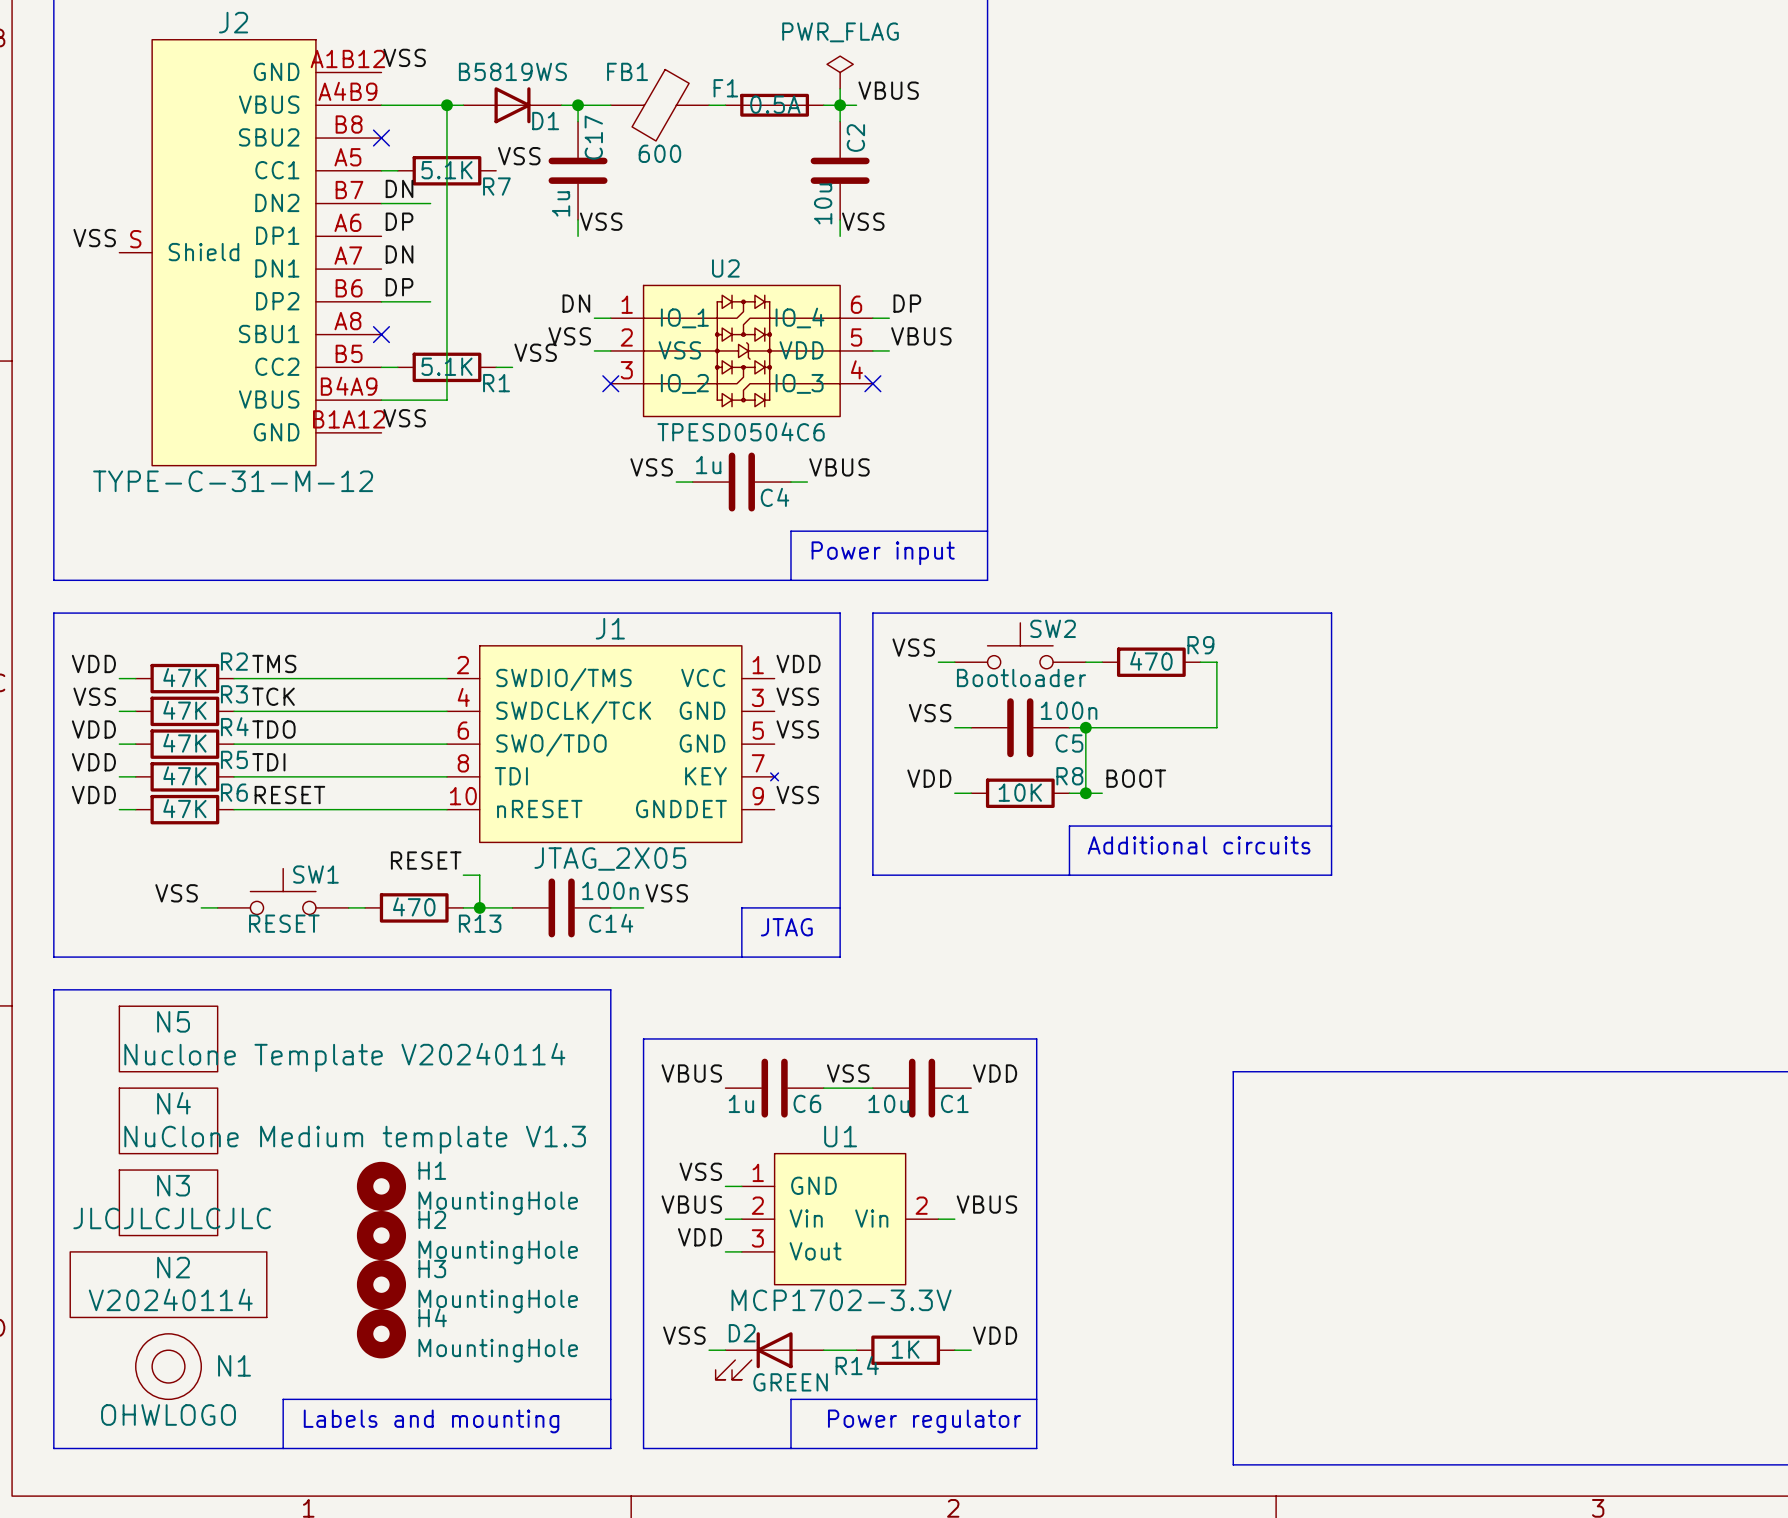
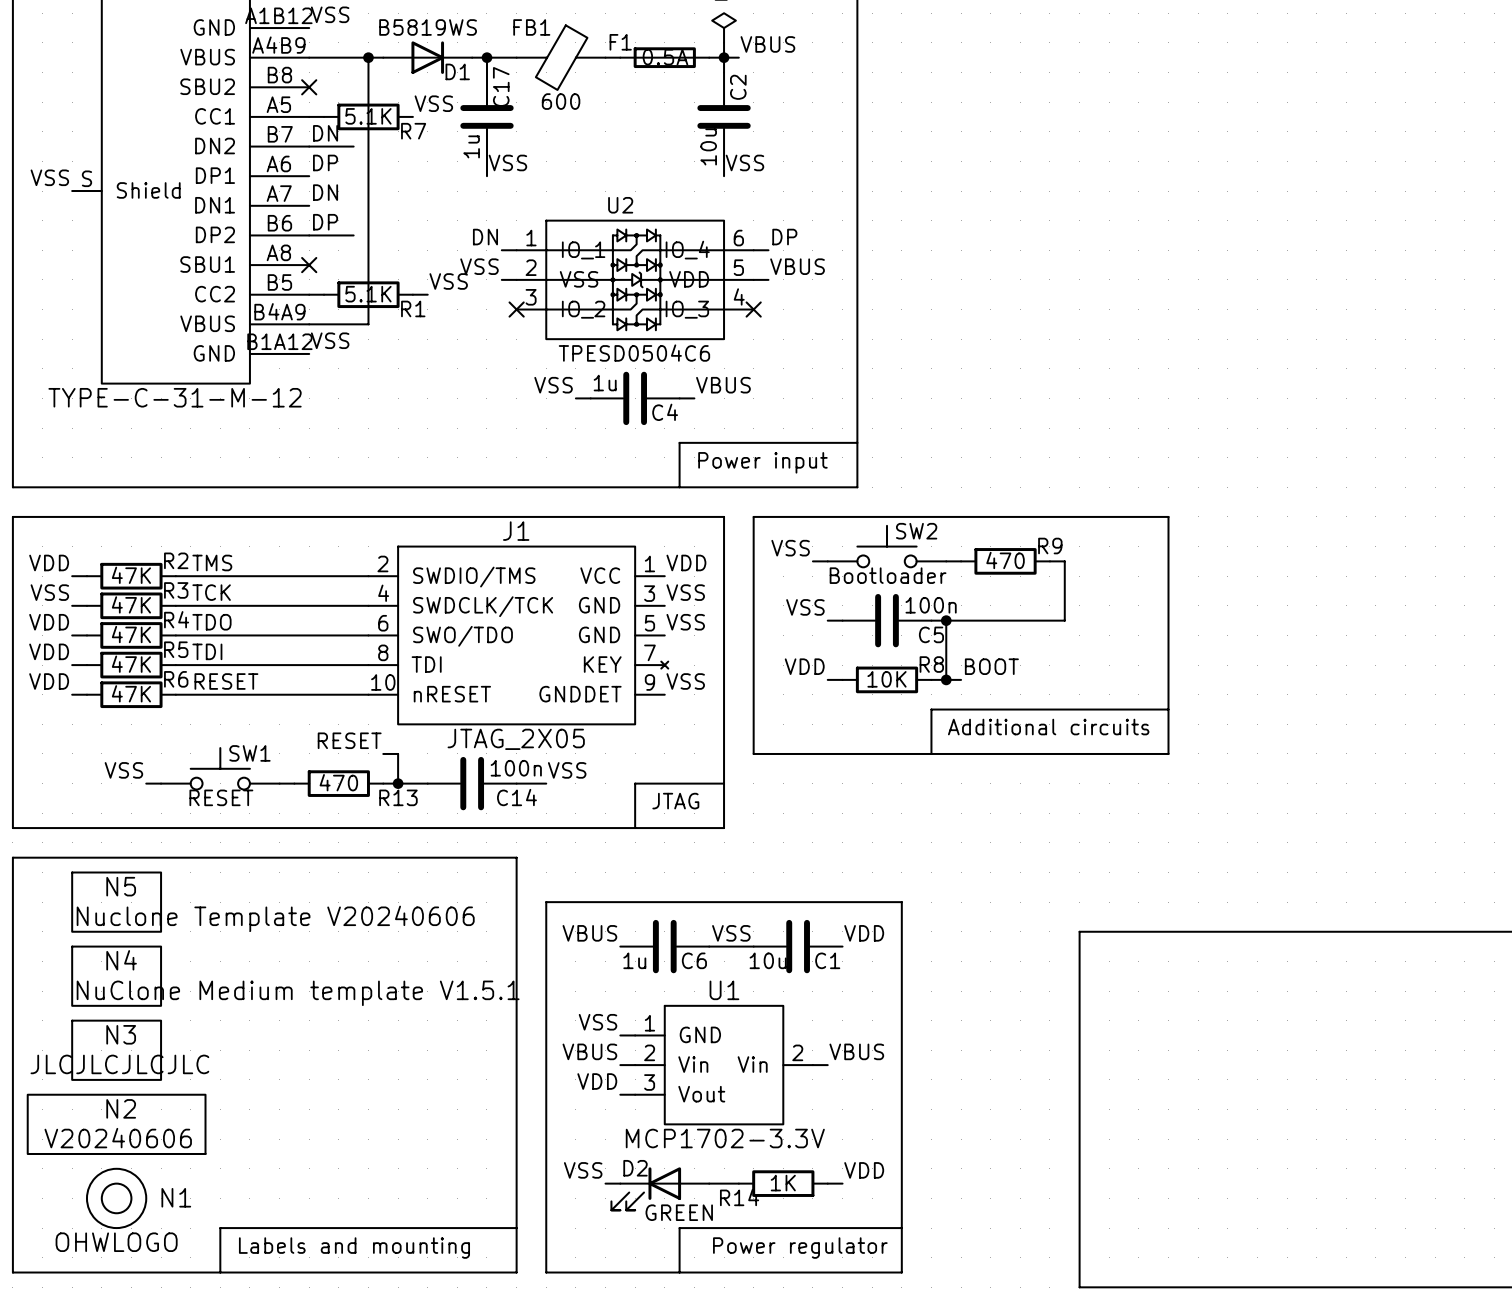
N5 value: Nuclone Template V20240114 (344, 1057) -> Nuclone Template V20240606 (275, 918)
N4 value: NuClone Medium template V1.3 (355, 1139) -> NuClone Medium template V1.5.1 (298, 993)
H1: MountingHole (381, 1186) -> none
H2: MountingHole (381, 1235) -> none
H3: MountingHole (381, 1284) -> none
N2 value: V20240114 (170, 1299) -> V20240606 (118, 1138)
H4: MountingHole (381, 1333) -> none

